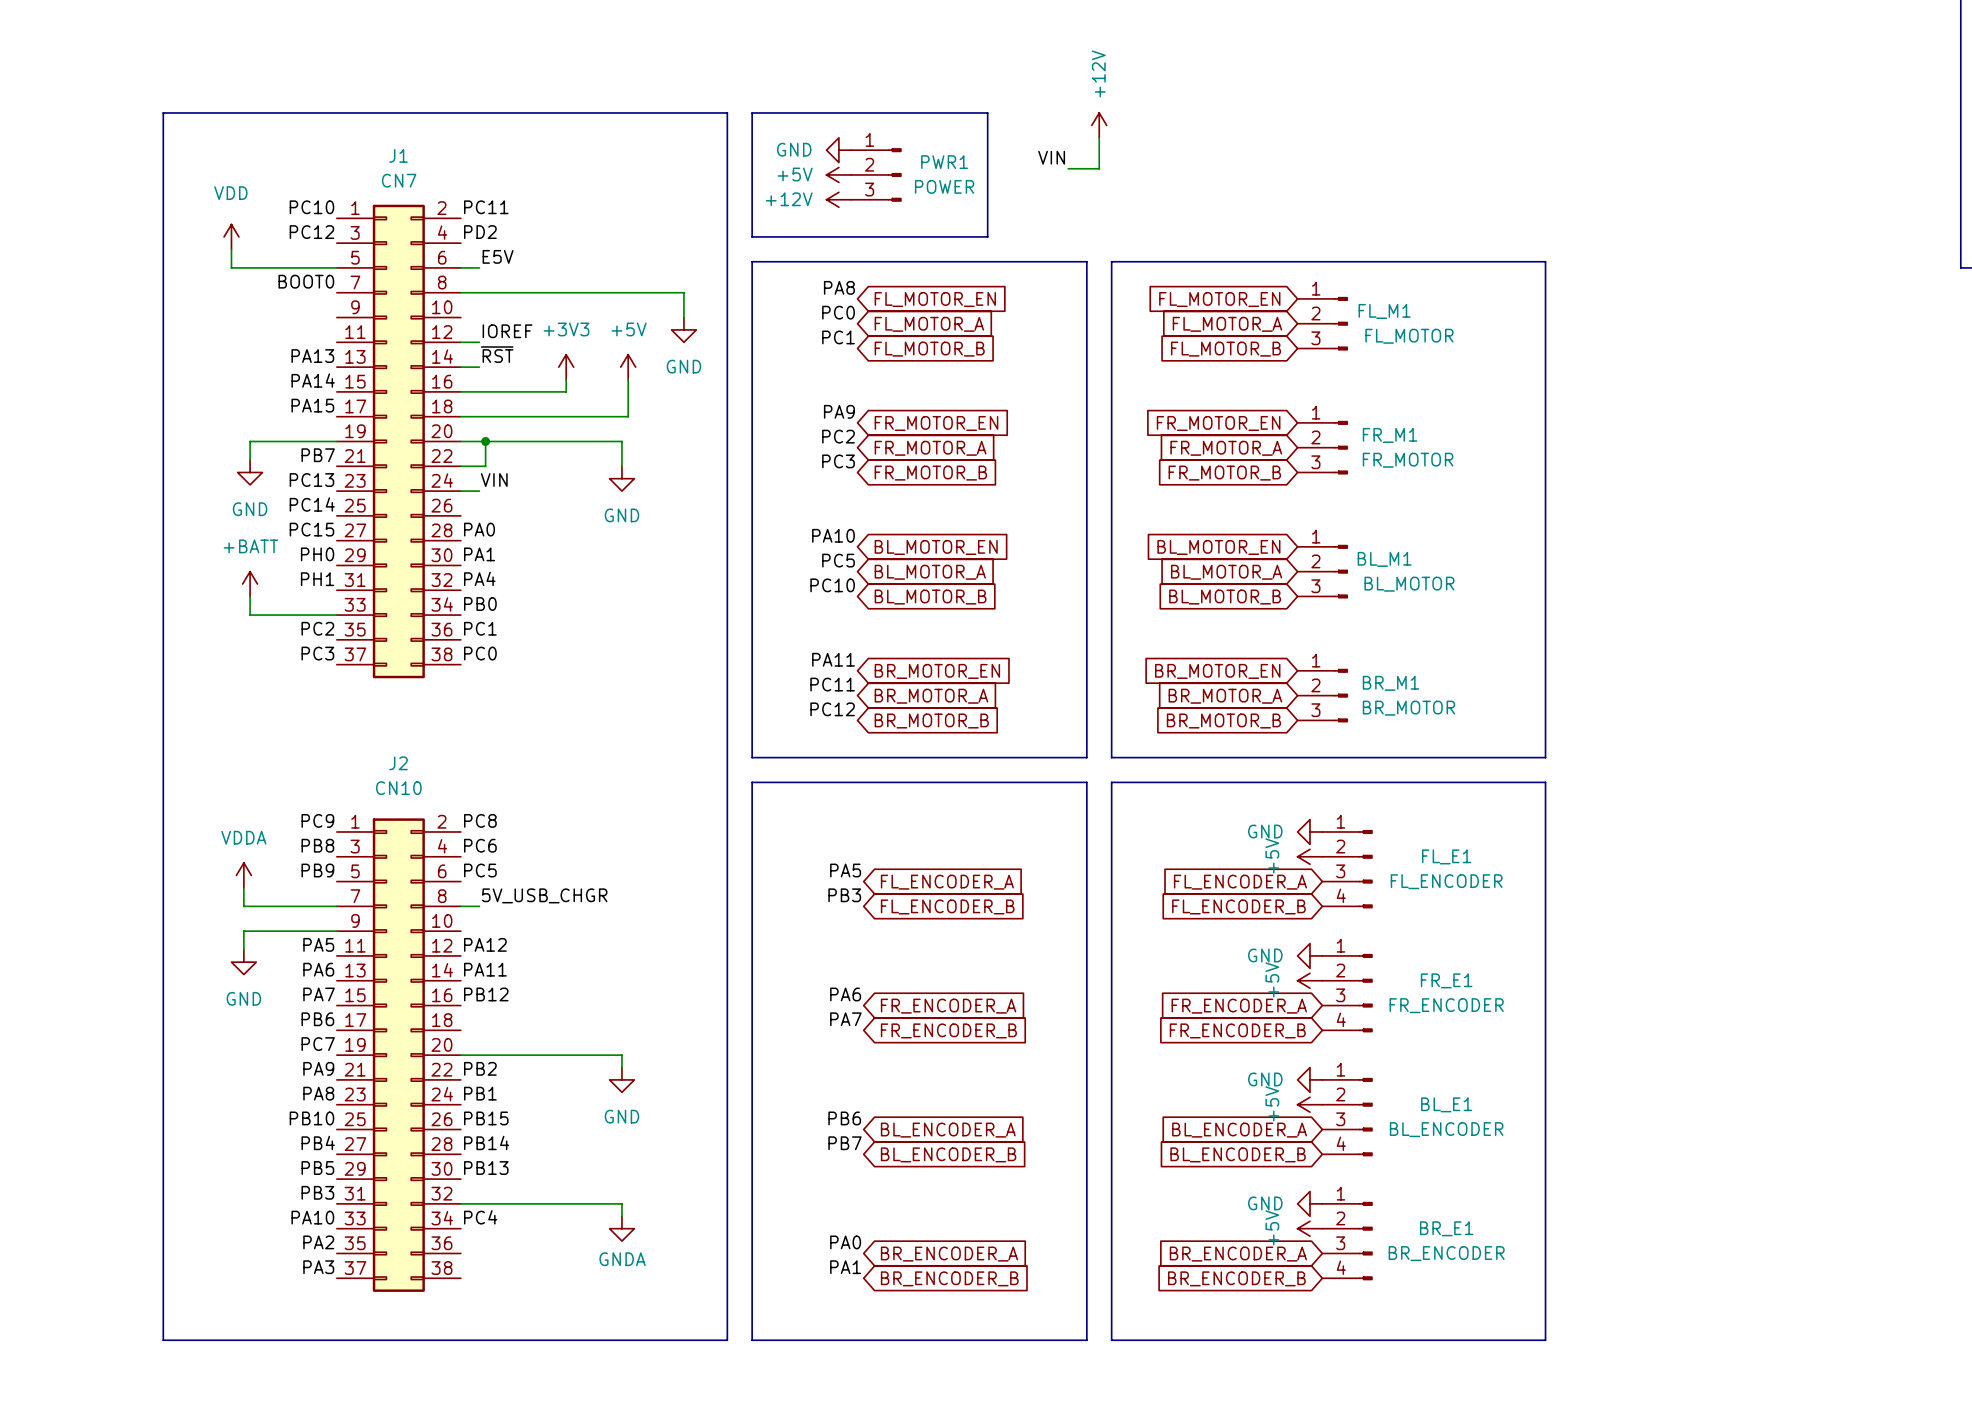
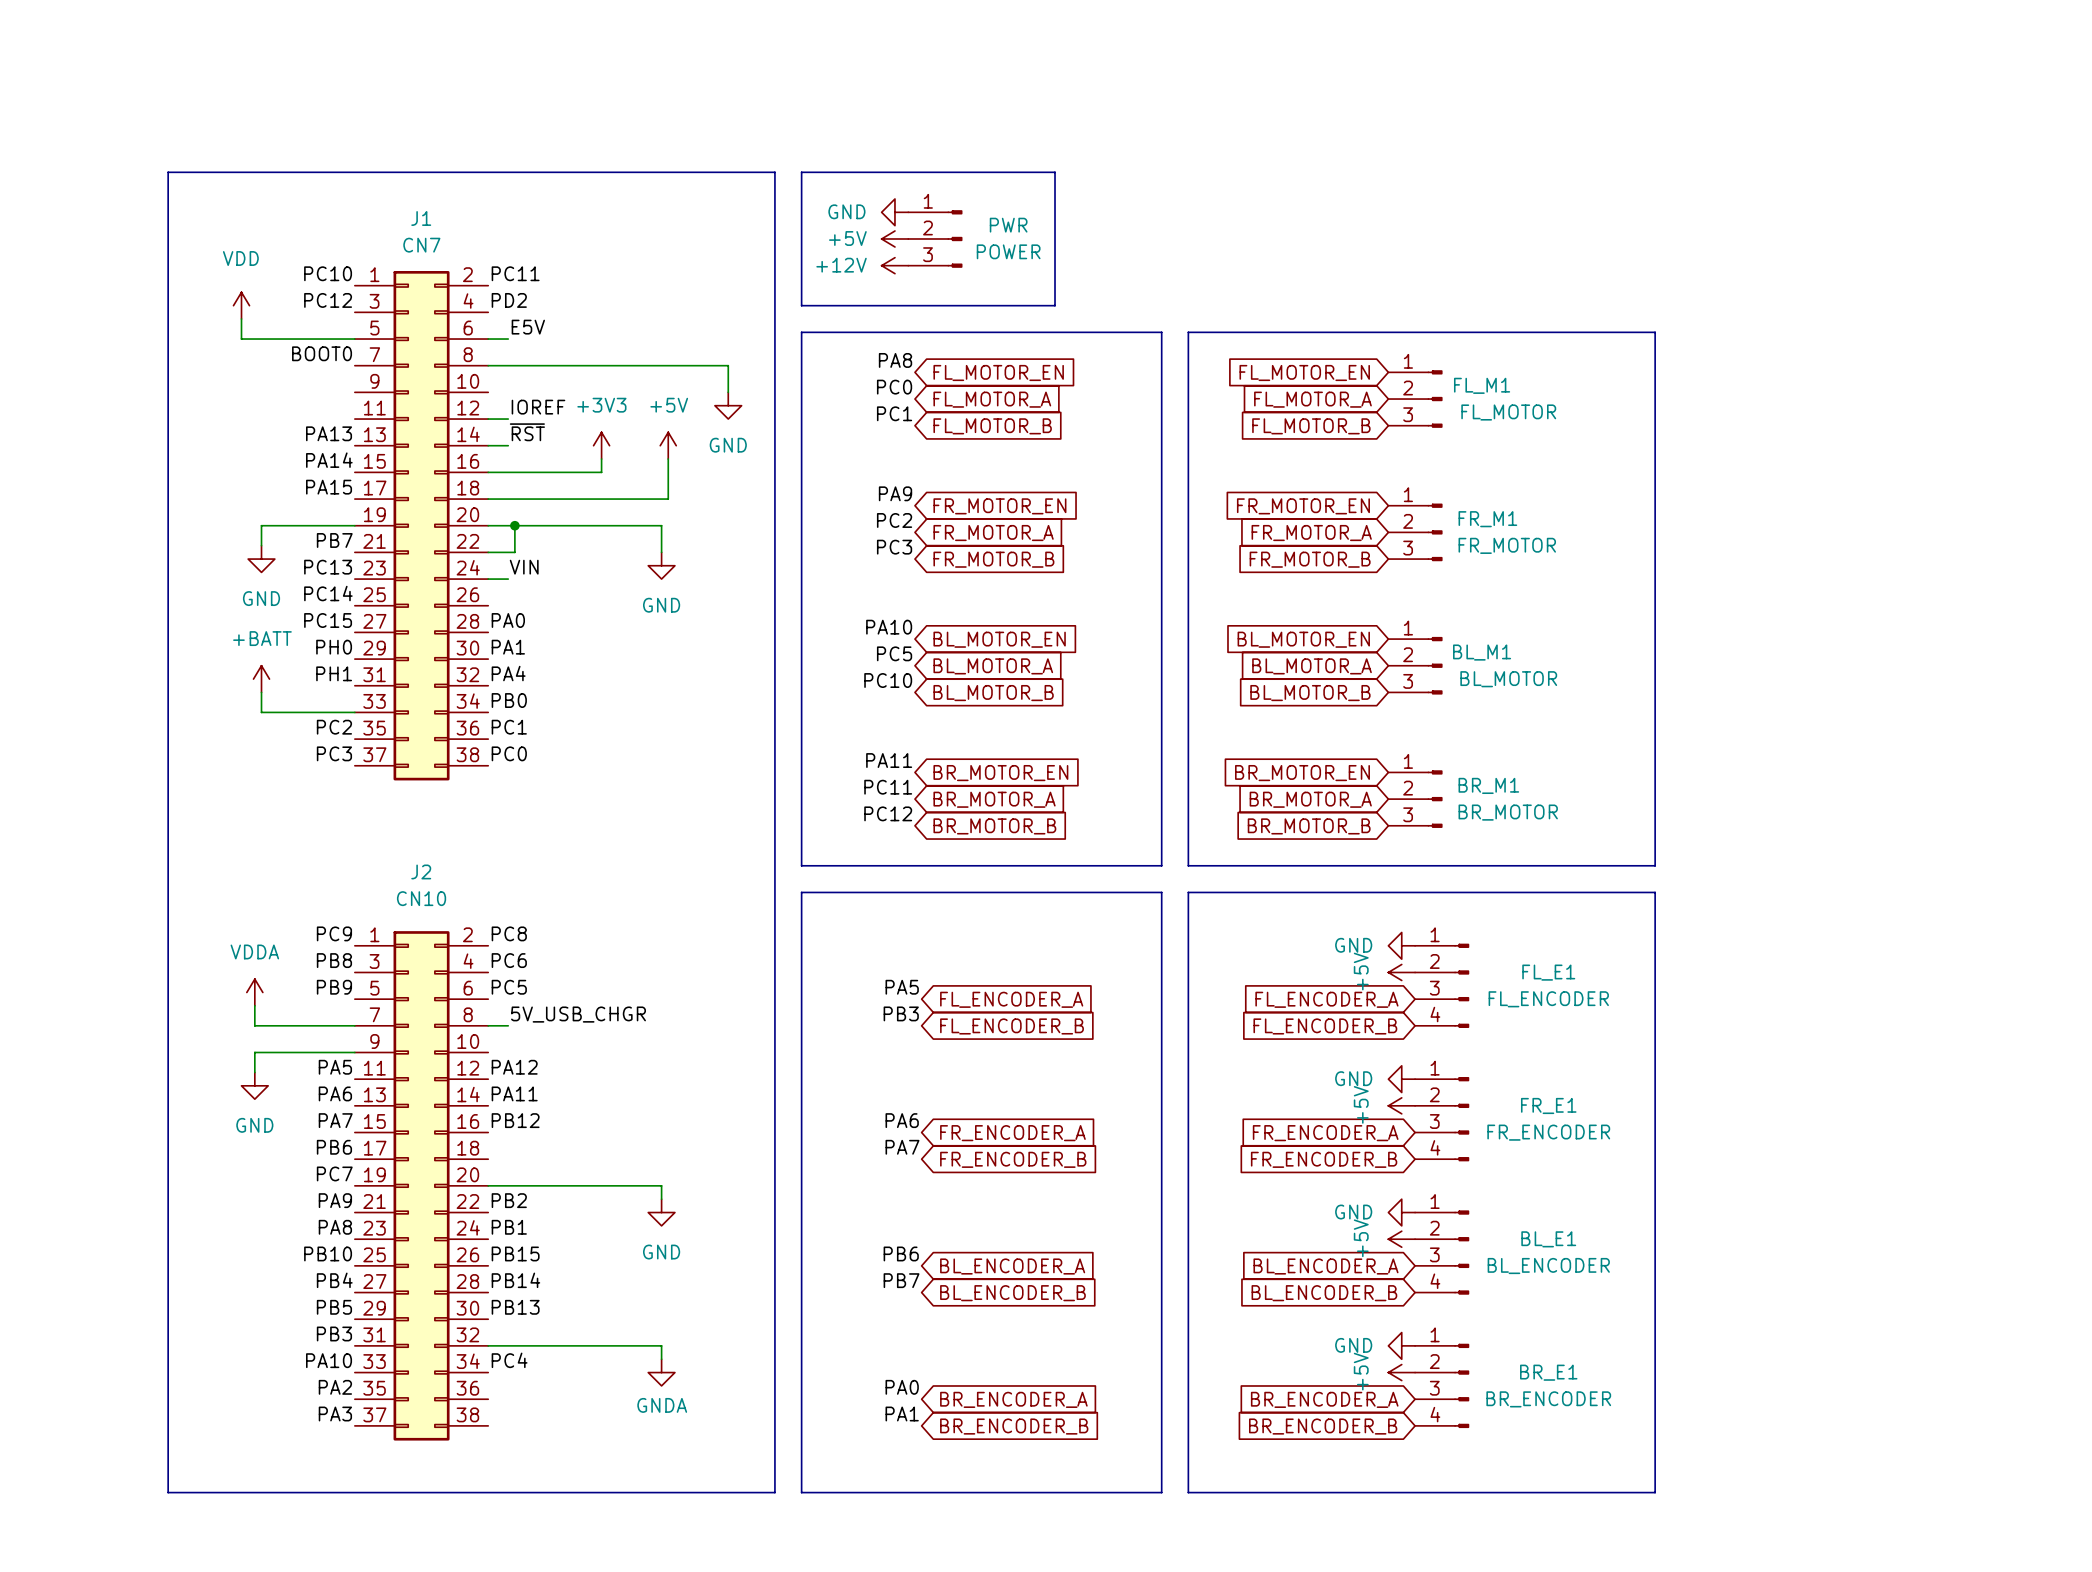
power symbol: +12V (1099, 125) -> none
wire: (1099, 137) (1099, 168) (1068, 168) -> none
label: VIN (1051, 157) -> none
PWR1 name: PWR1 (944, 162) -> PWR (1008, 225)

